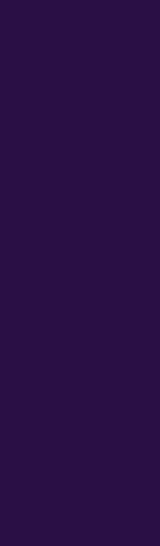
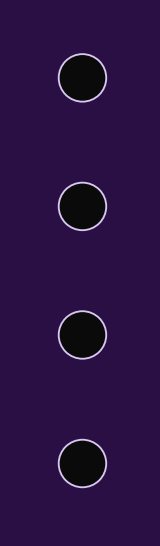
part: none -> (82, 77)
part: none -> (82, 206)
part: none -> (82, 334)
part: none -> (82, 463)

